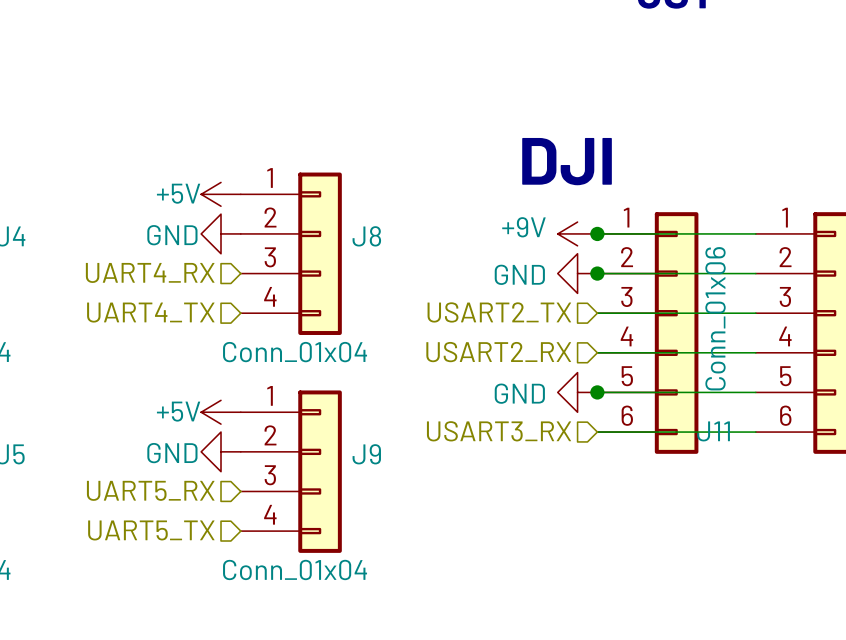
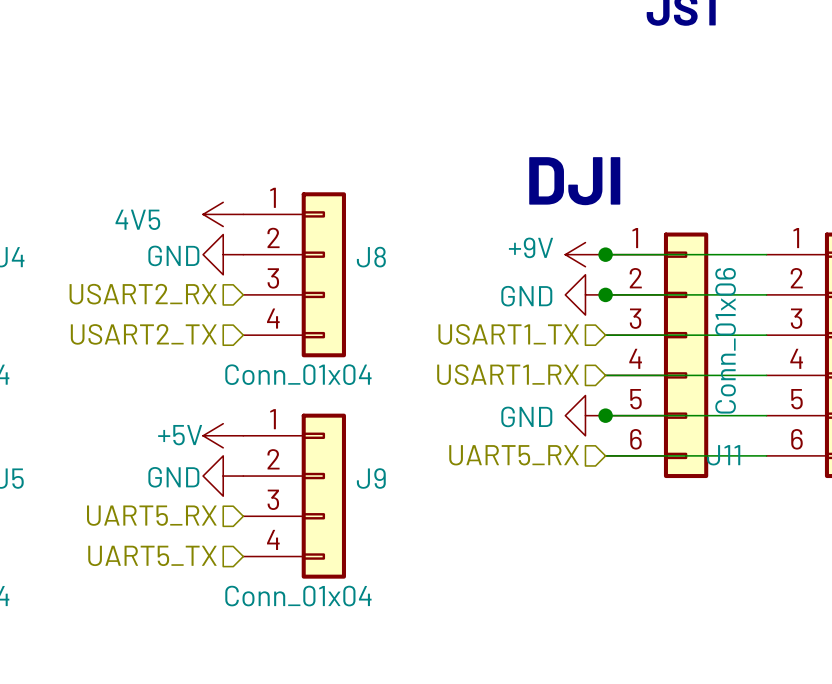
power symbol: +5V (221, 194) -> 4V5 (223, 214)
hierarchical label: UART4_RX (150, 272) -> USART2_RX (143, 294)
hierarchical label: UART4_TX (150, 312) -> USART2_TX (143, 334)
hierarchical label: USART2_TX (499, 312) -> USART1_TX (508, 334)
hierarchical label: USART2_RX (498, 352) -> USART1_RX (508, 374)
hierarchical label: USART3_RX (499, 431) -> UART5_RX (514, 455)

